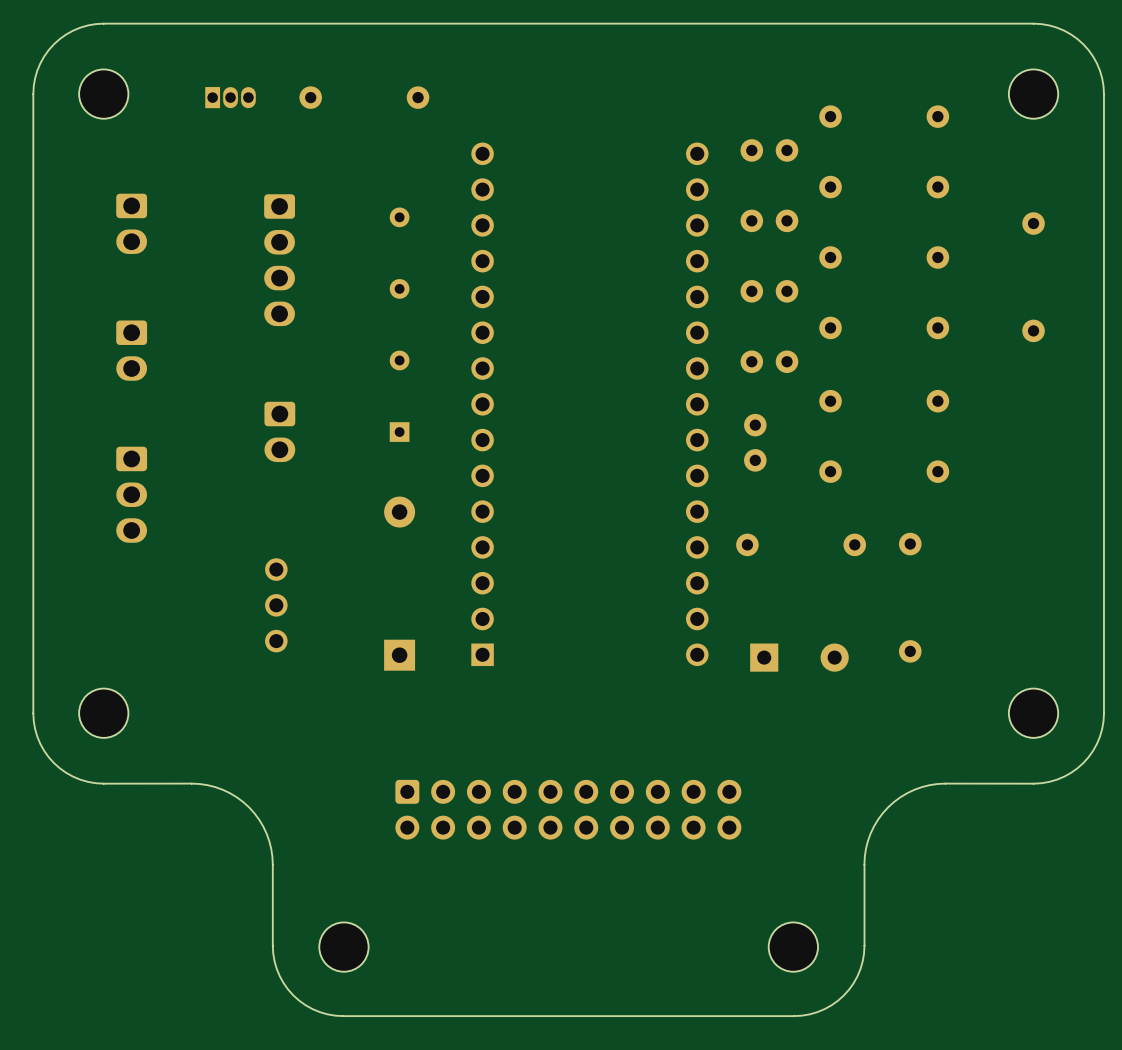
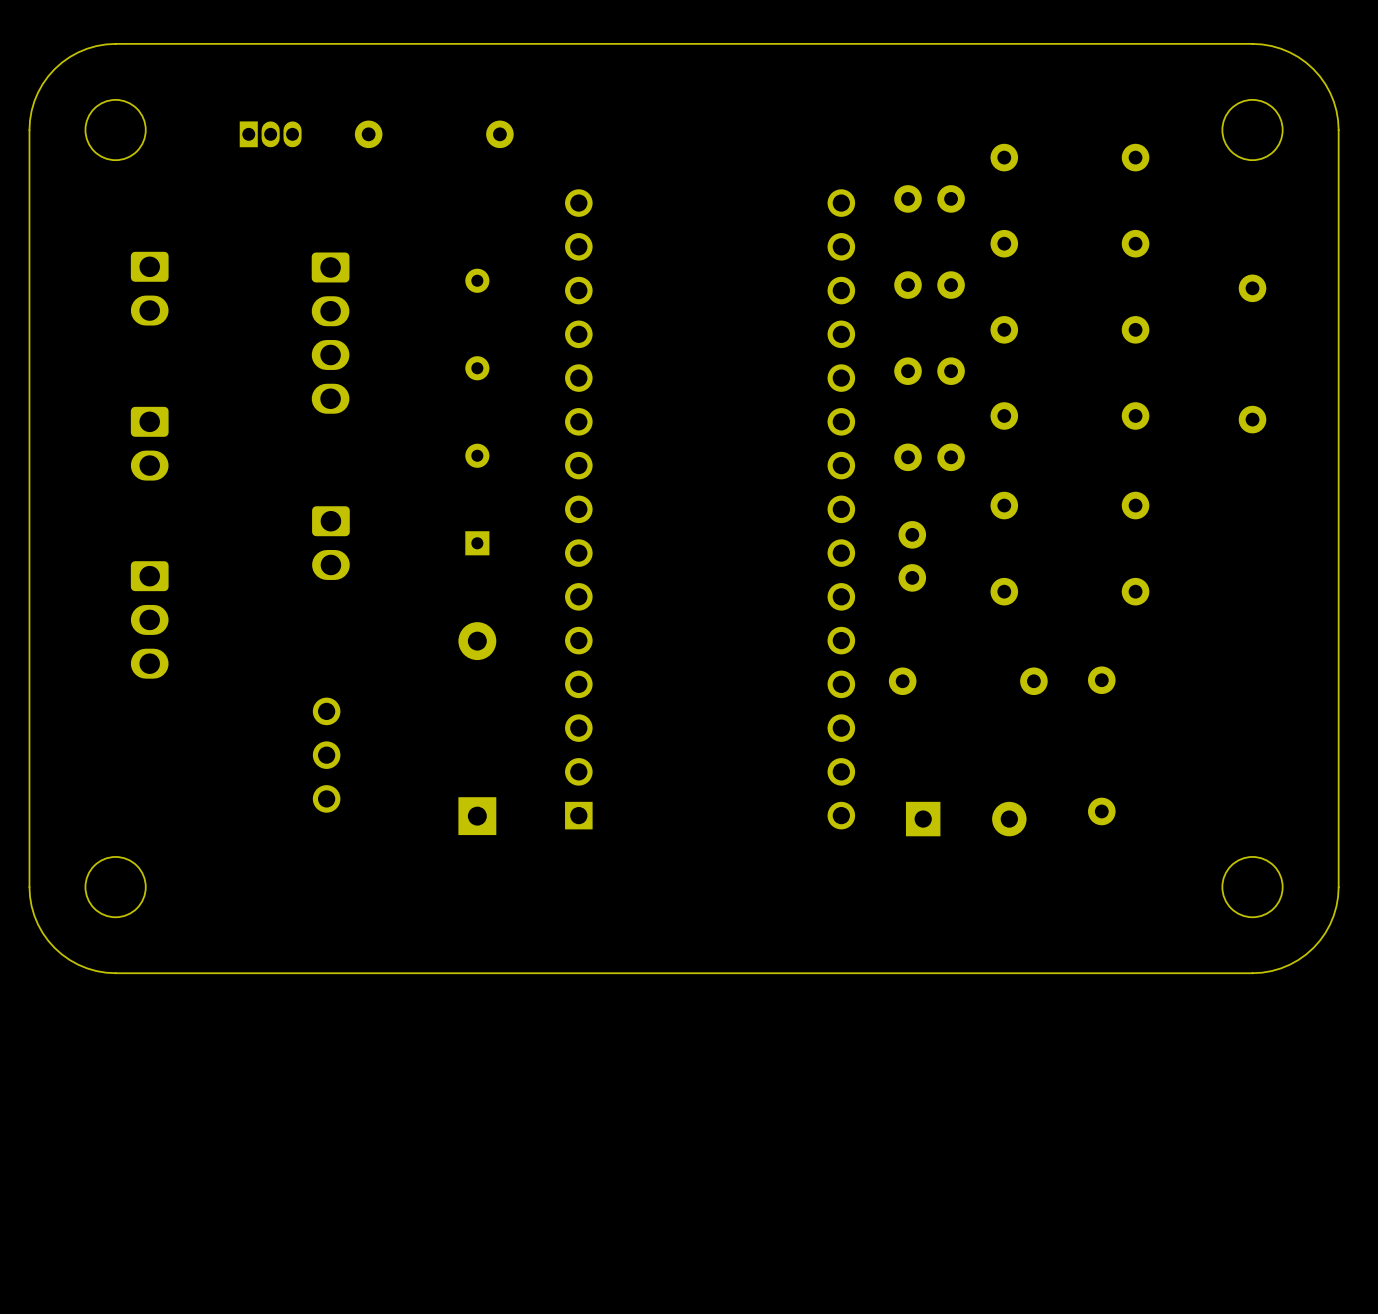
board edge: (103, 783) (207, 785) (229, 793) (249, 807) (263, 826) (271, 848) (273, 953) (279, 976) (293, 995) (305, 1005) (319, 1012) (335, 1015) (794, 1016) (809, 1014) (831, 1005) (843, 995) (853, 983) (860, 968) (864, 945) (864, 864) -> (115, 973) (1252, 973)
board edge: (1033, 783) (937, 783) (921, 787) (907, 793) (888, 807) (878, 819) (867, 841) (864, 864) -> none
part: (568, 809) -> none
part: (343, 947) -> none
part: (793, 947) -> none

